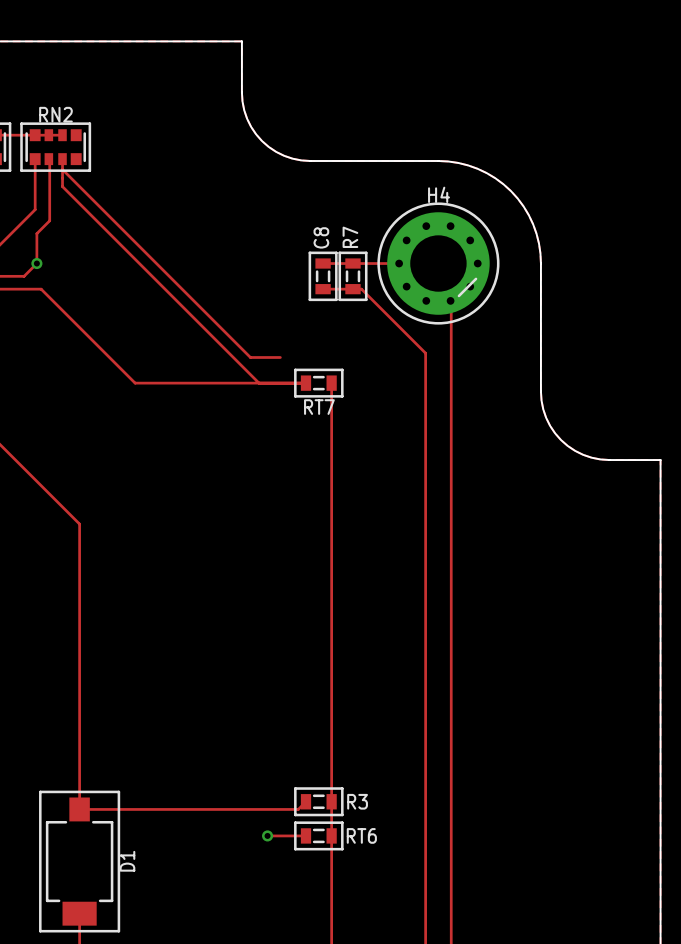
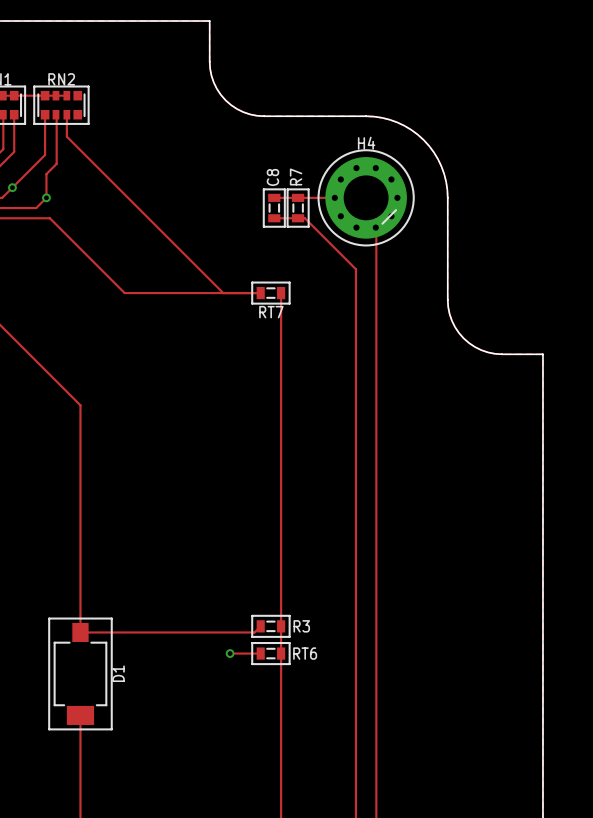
track: (62, 169) (250, 357) (280, 357) -> none

